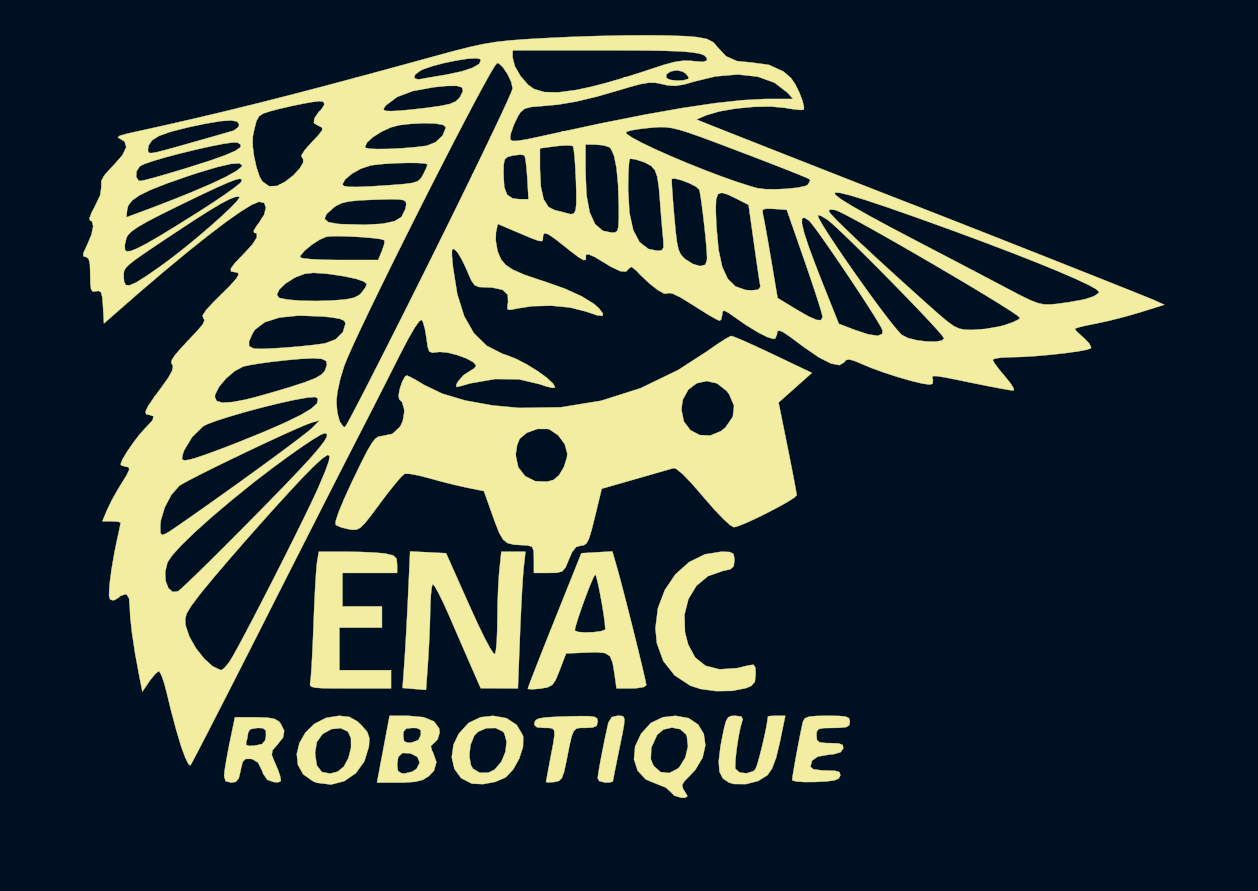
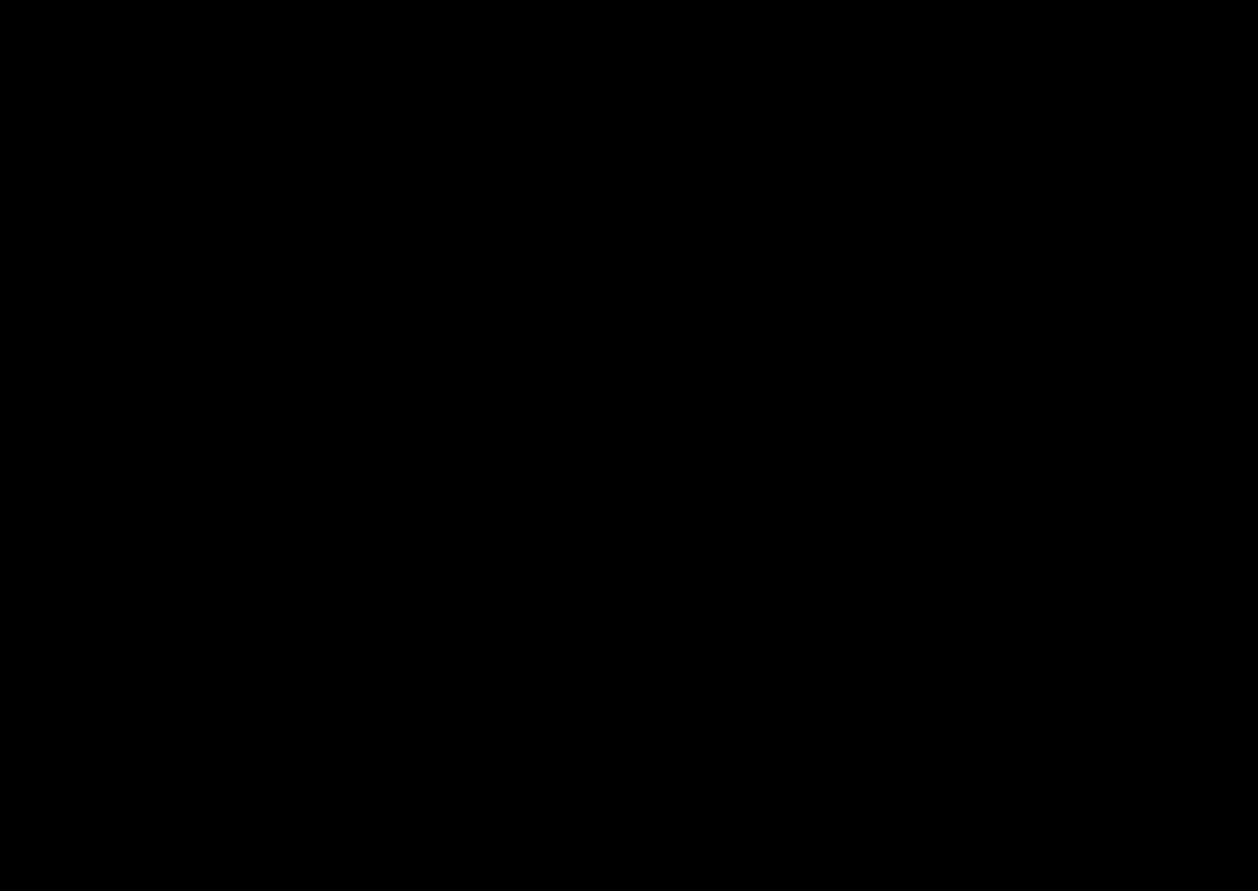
drawing: [83, 35, 1165, 798] -> none

